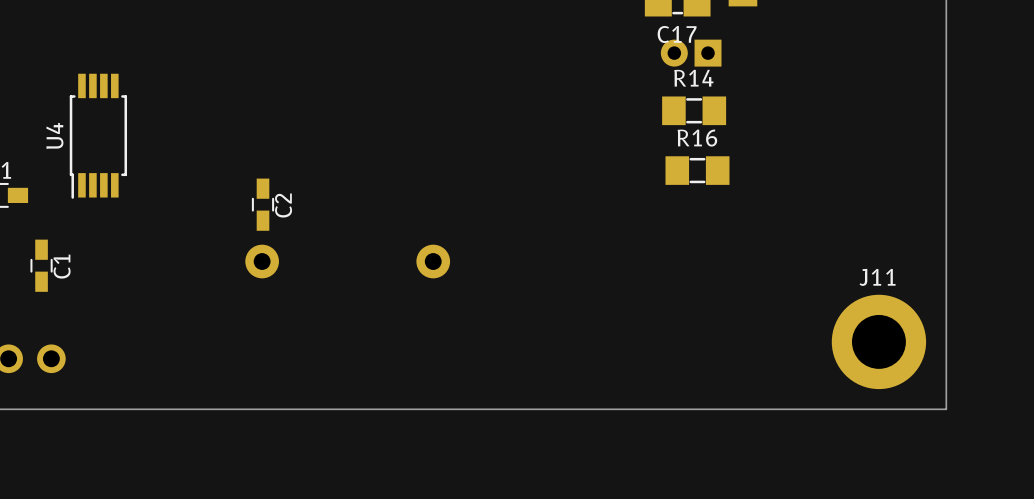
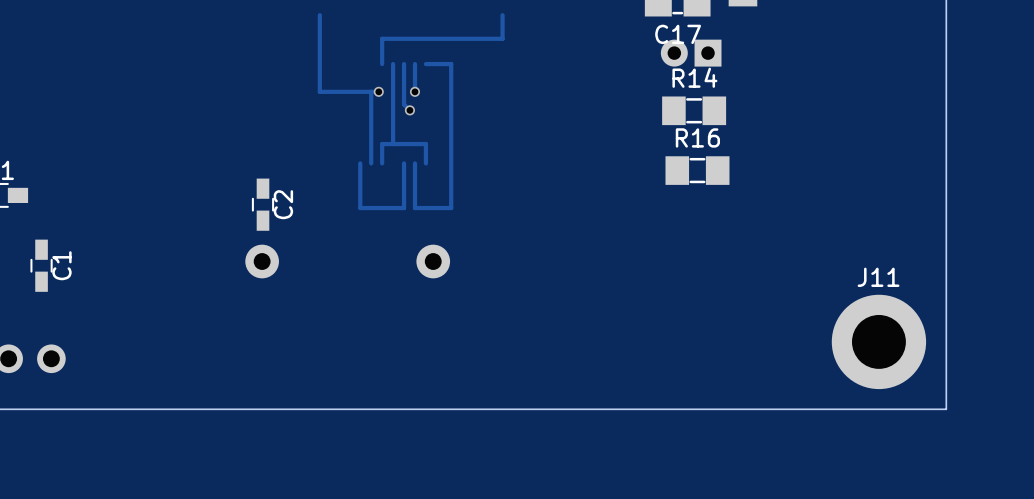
track: none -> (319, 15) (319, 91) (378, 91)
track: none -> (502, 15) (502, 38) (382, 38) (382, 64)
track: none -> (393, 64) (393, 144)
track: none -> (404, 64) (404, 104) (409, 110)
track: none -> (414, 64) (414, 91)
track: none -> (425, 64) (451, 64) (451, 208) (414, 208) (414, 163)
track: none -> (371, 91) (371, 163)
via: none -> (378, 91)
via: none -> (414, 91)
via: none -> (409, 110)
U4: (98, 136) -> none
track: none -> (360, 163) (360, 208) (404, 208) (404, 163)
track: none -> (382, 163) (382, 144) (425, 144) (425, 163)

